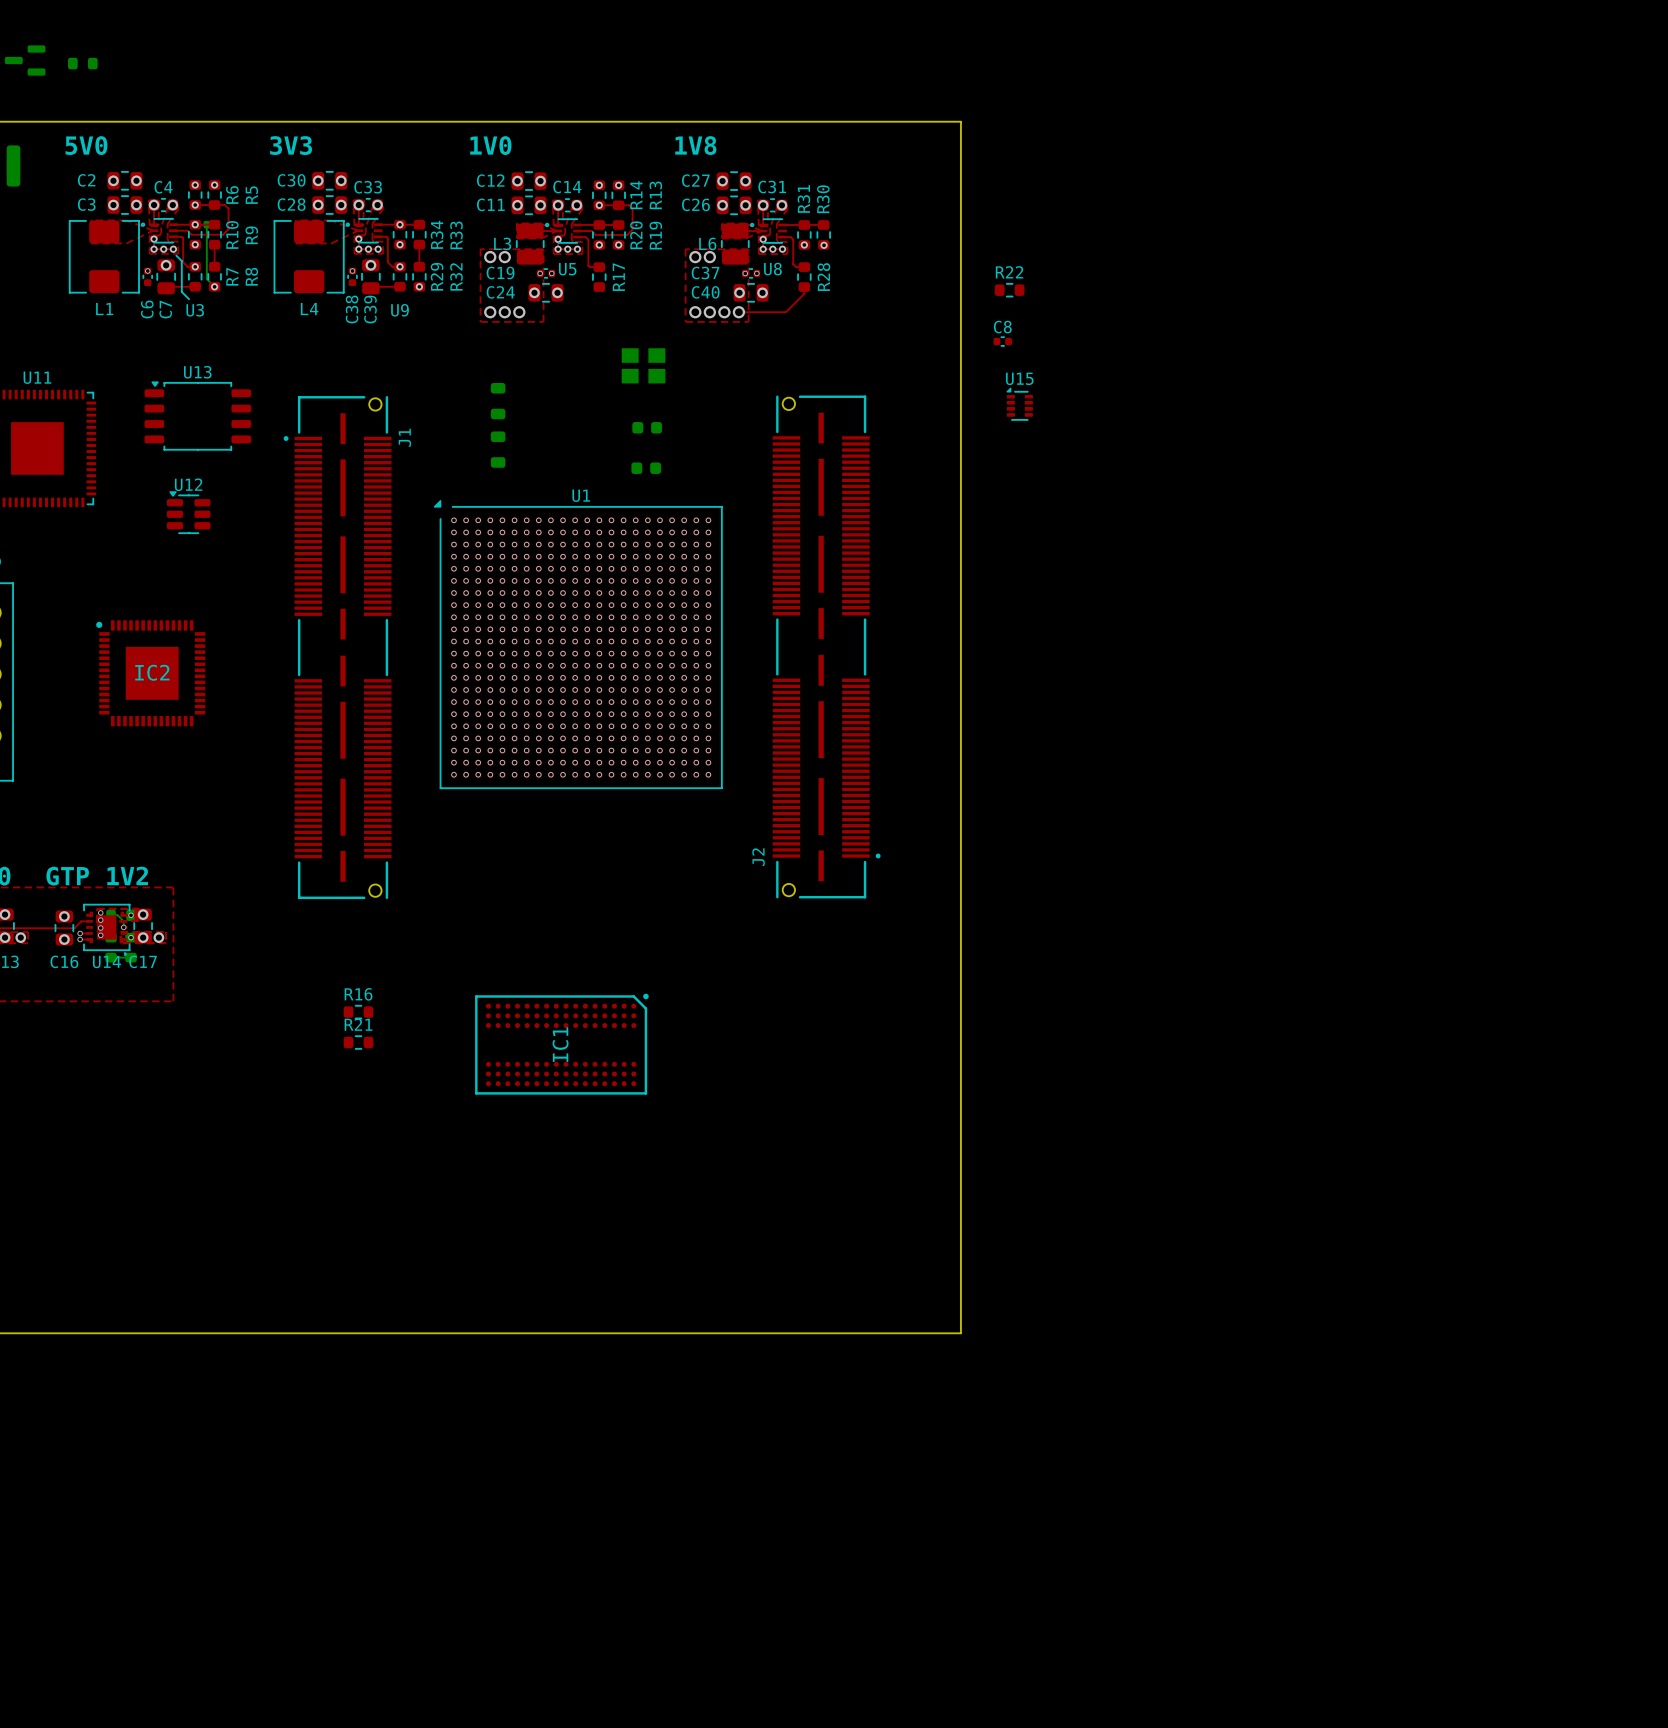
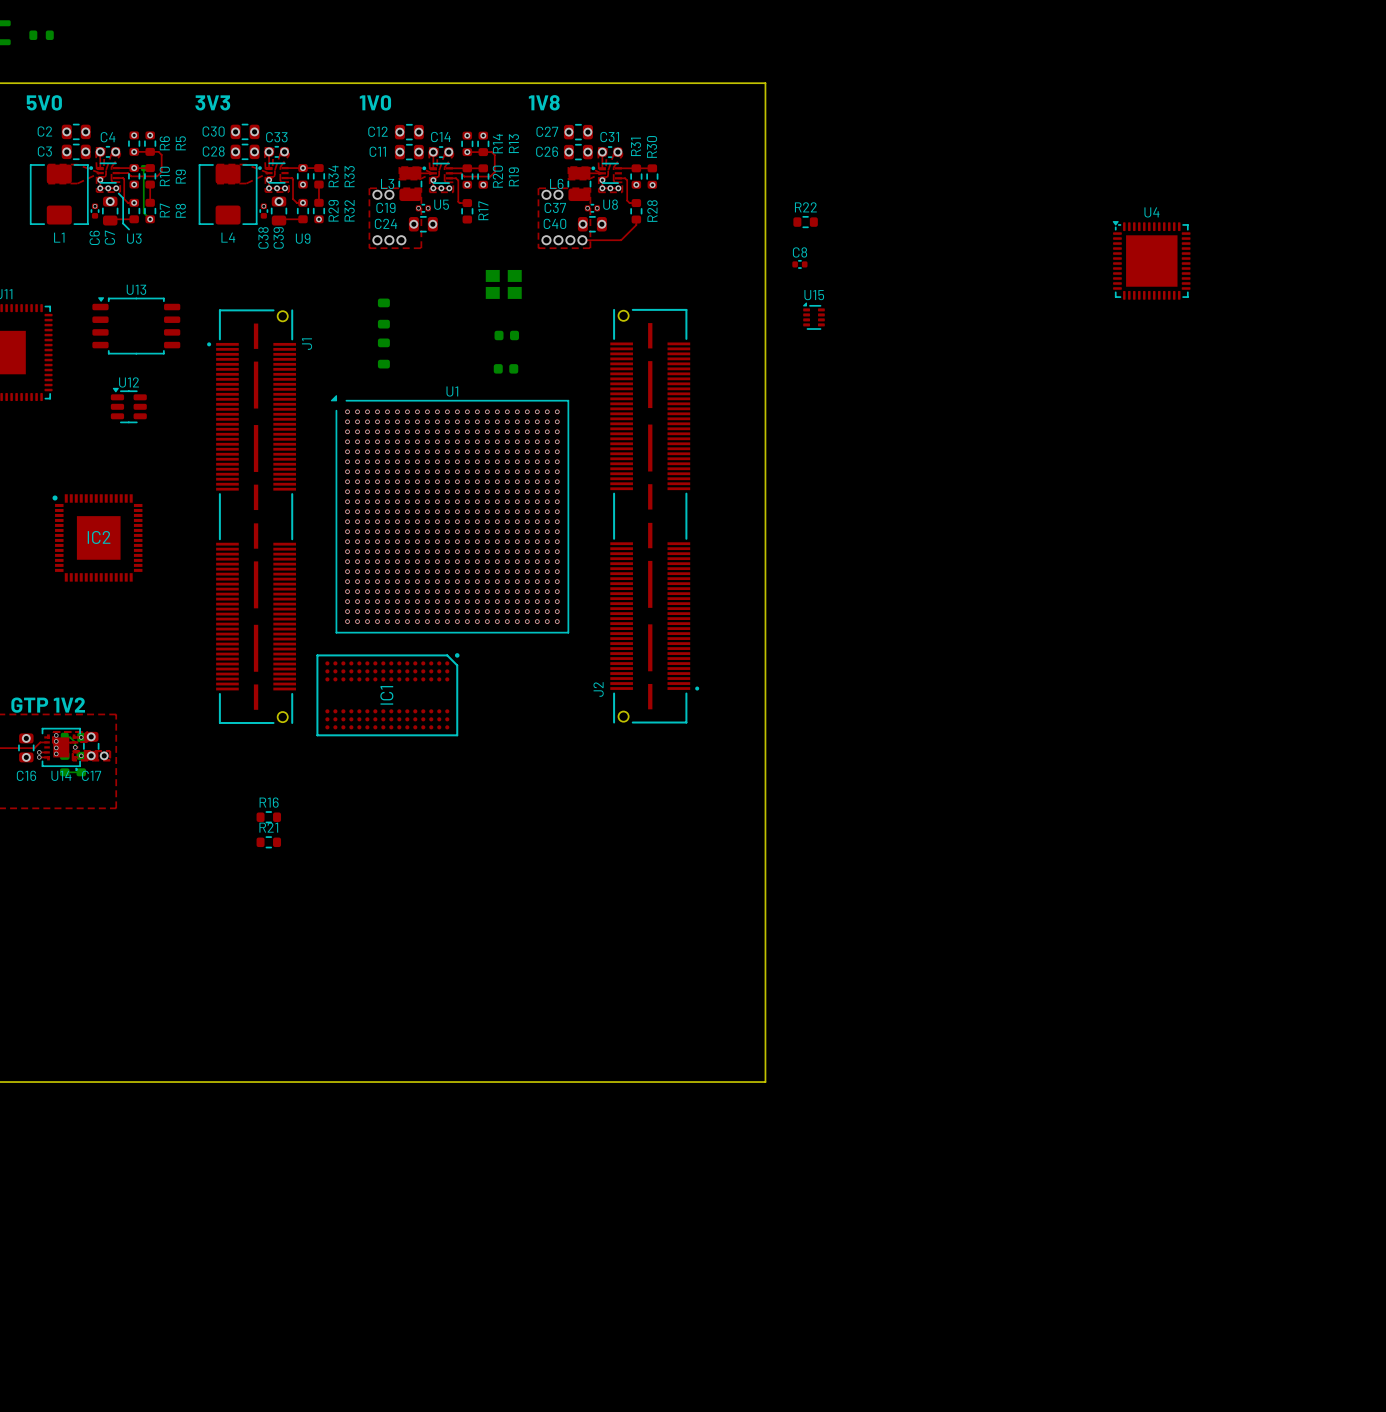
U4: none -> (1151, 260)
IC1 position: (561, 1044) -> (387, 694)

